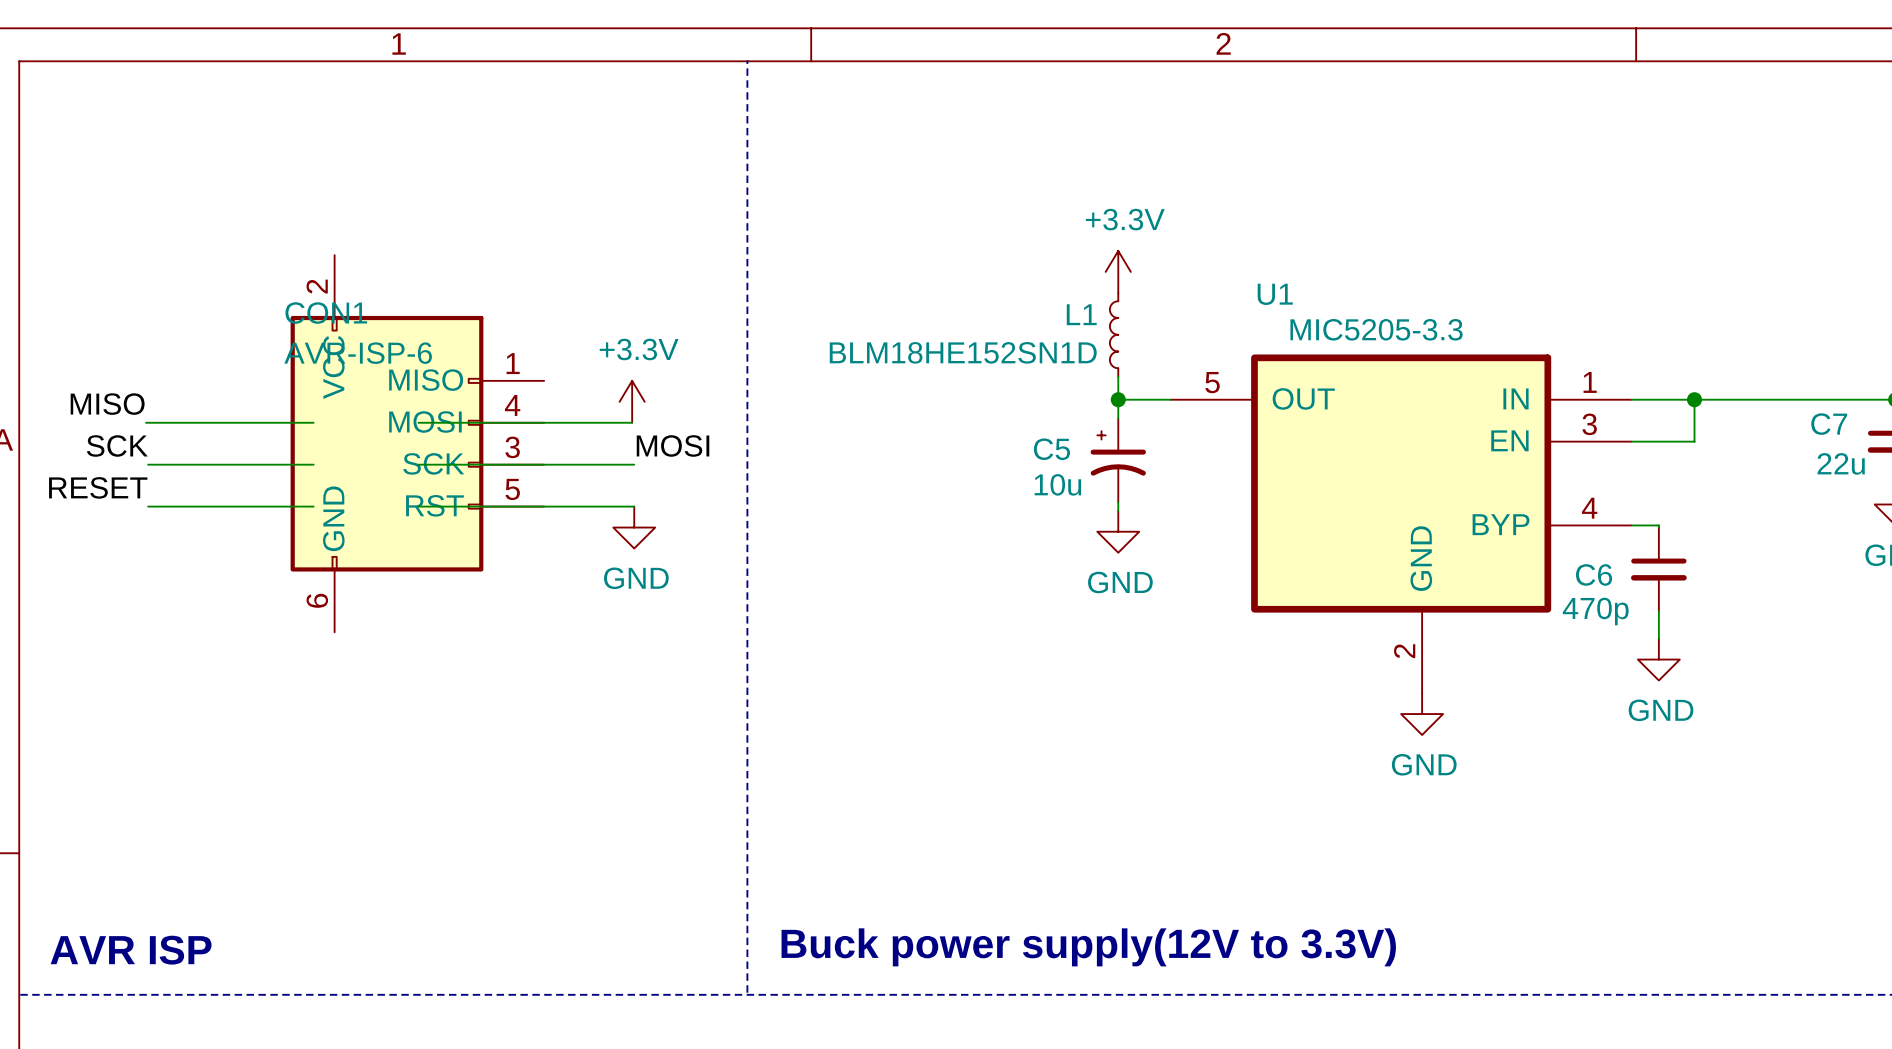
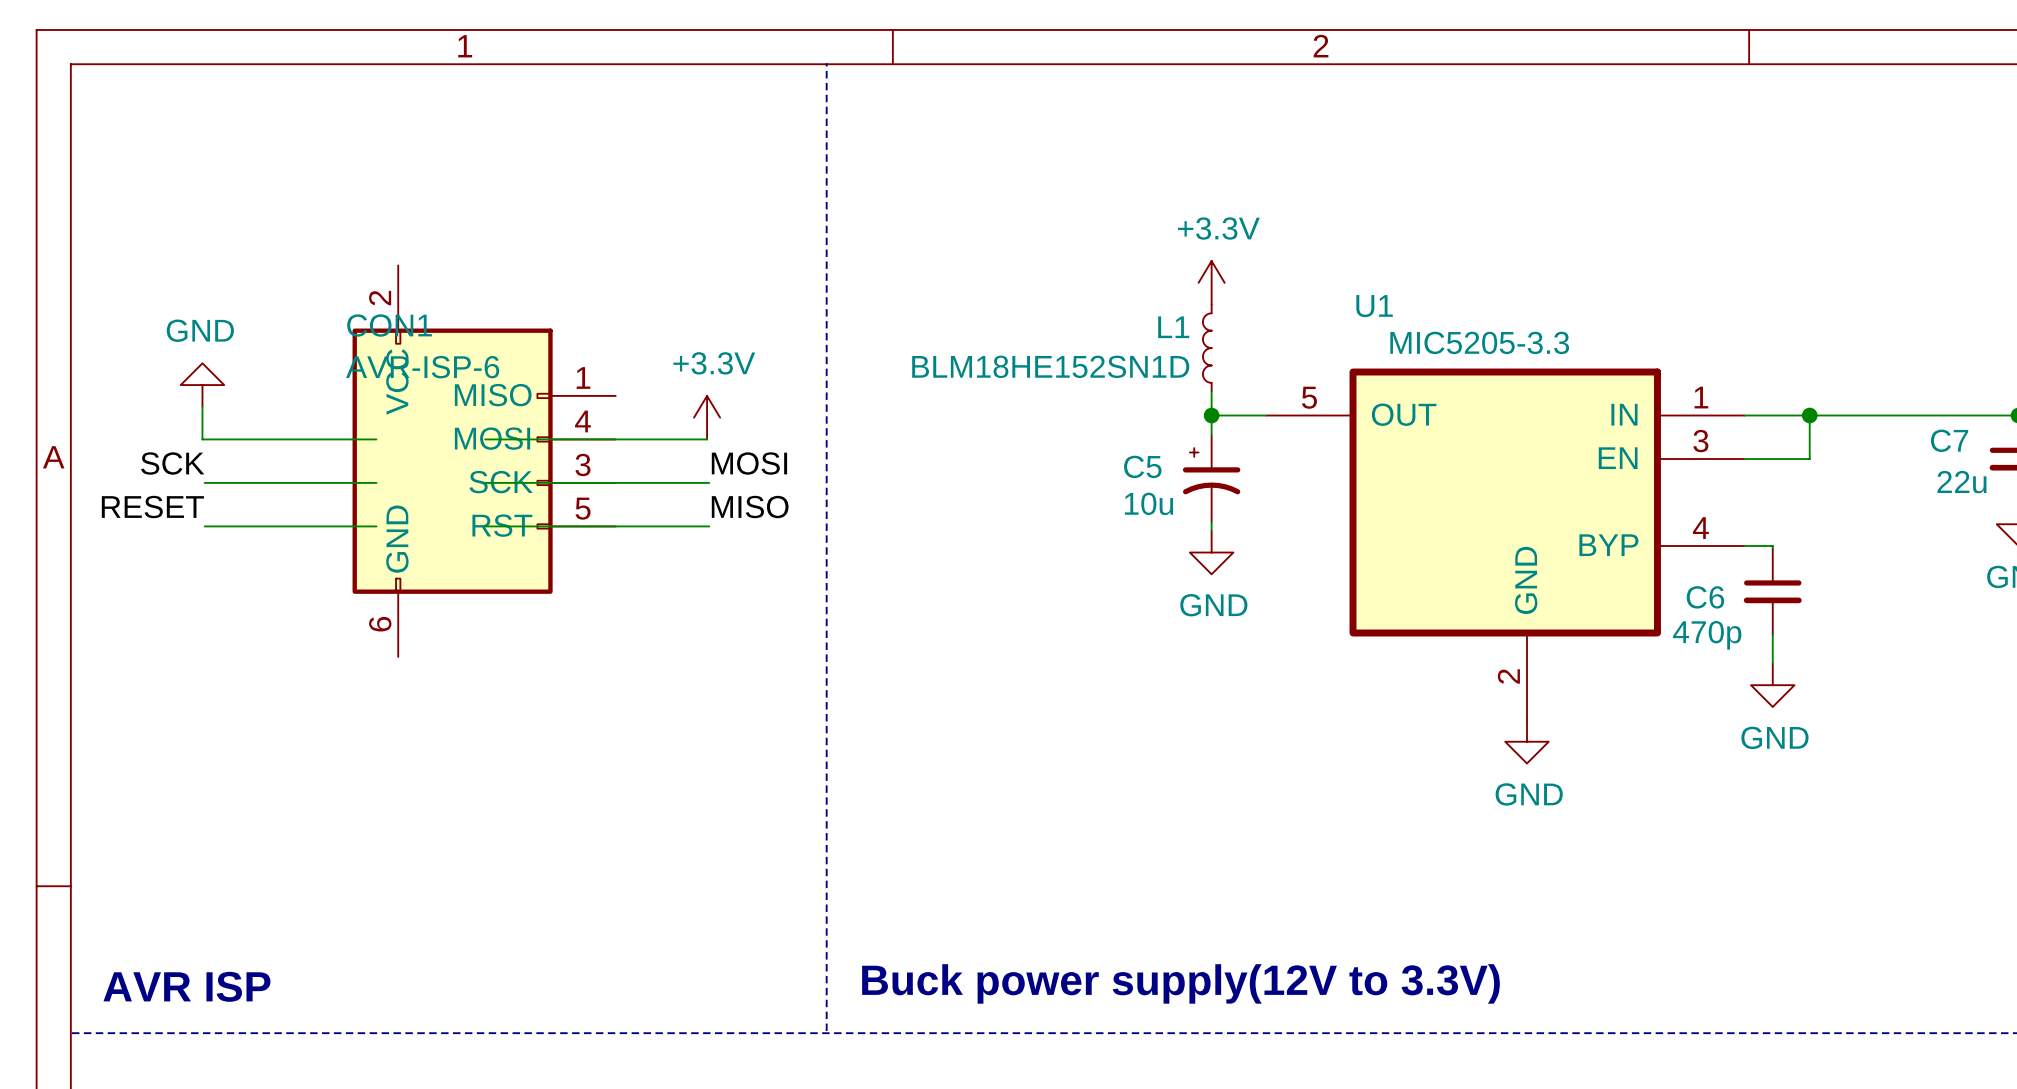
power symbol: none -> GND (202, 385)
wire: none -> (202, 406) (202, 439)
label: MISO (107, 404) -> none
label: none -> MISO (750, 507)
power symbol: GND (634, 527) -> none

